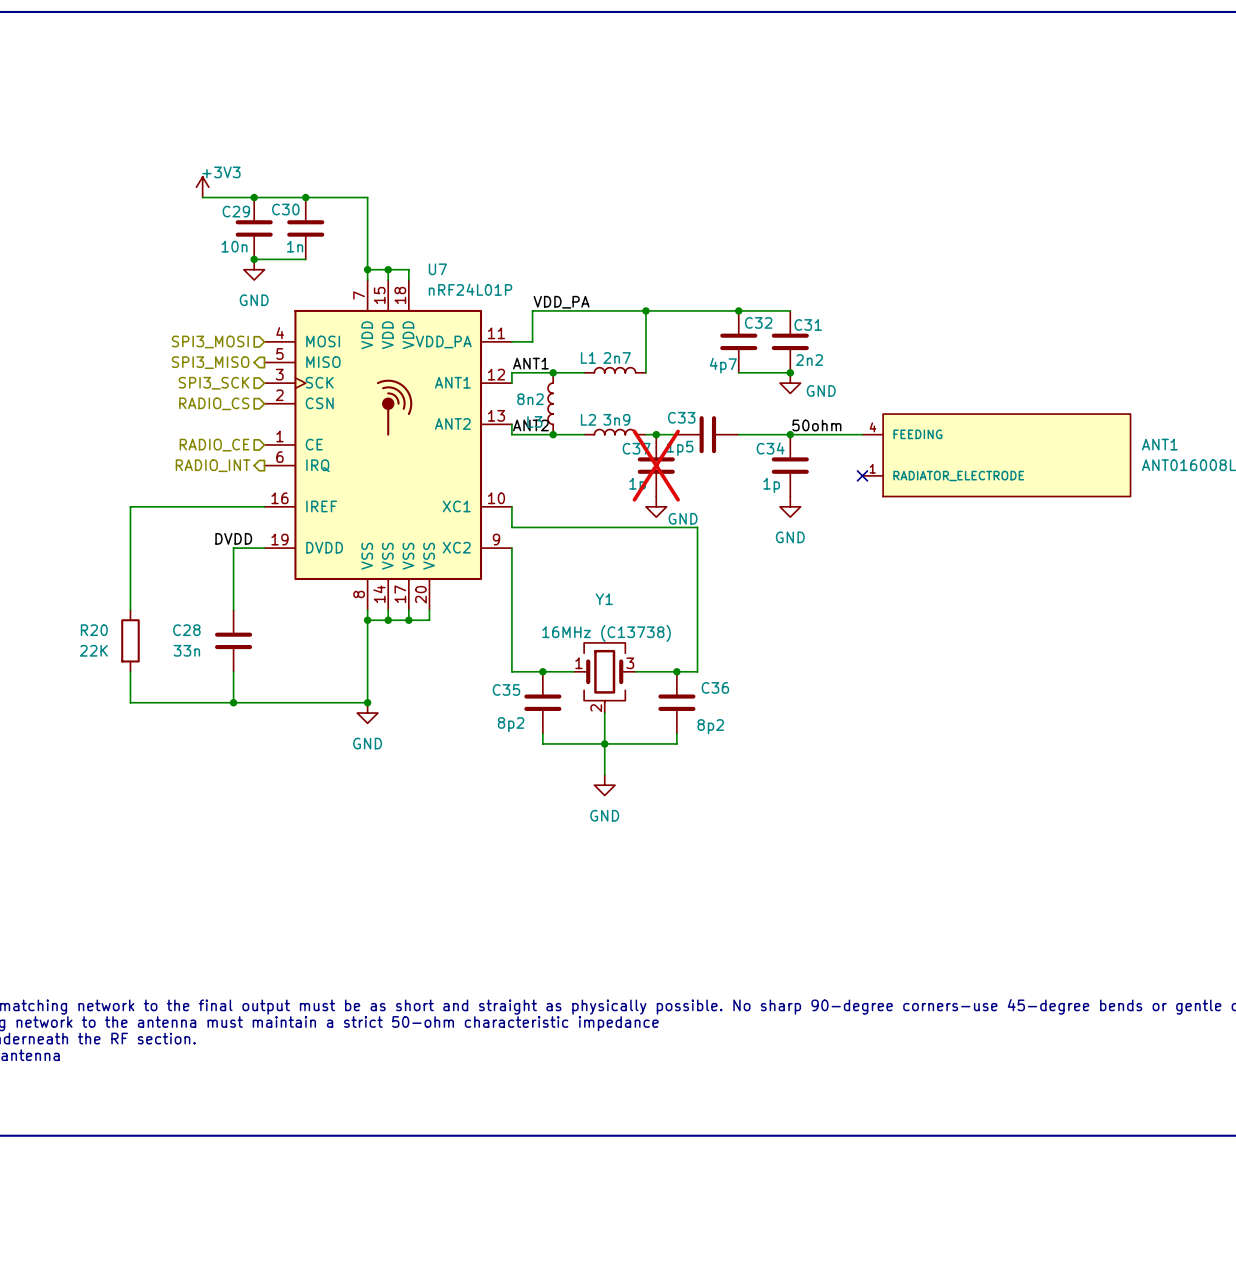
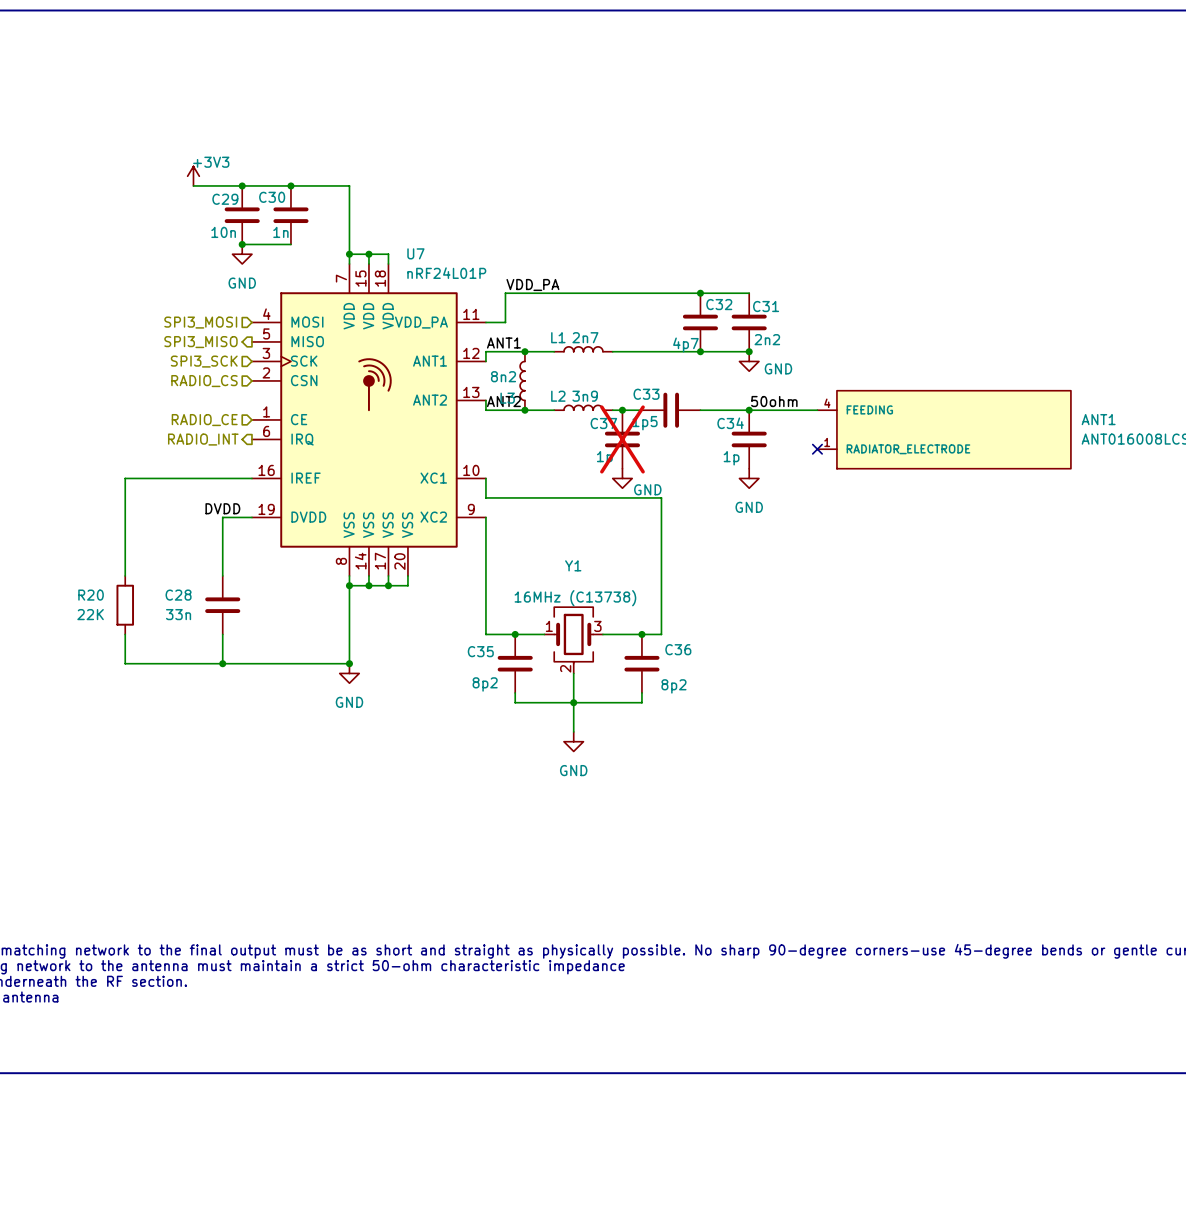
wire: (645, 310) (645, 372) -> (700, 351) (612, 351)
junction: (645, 310) -> none
junction: none -> (700, 351)

